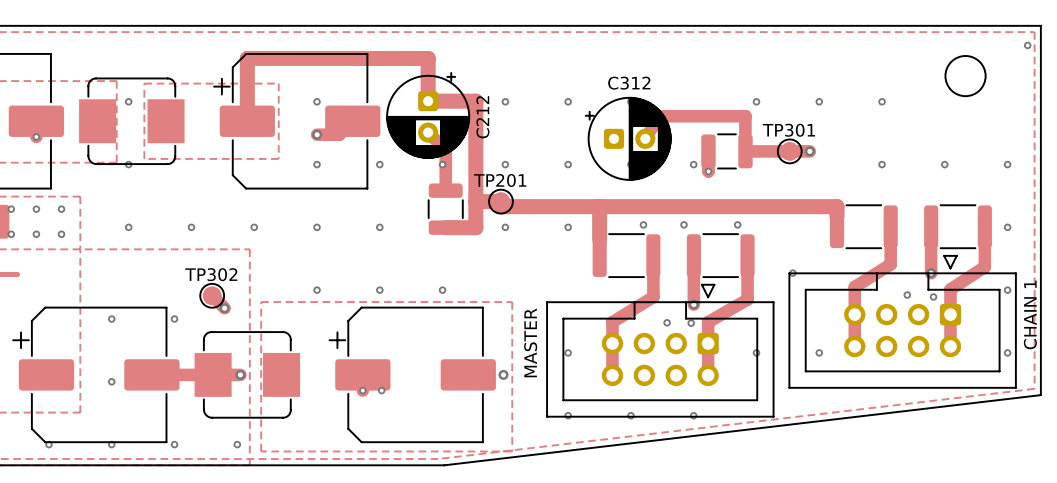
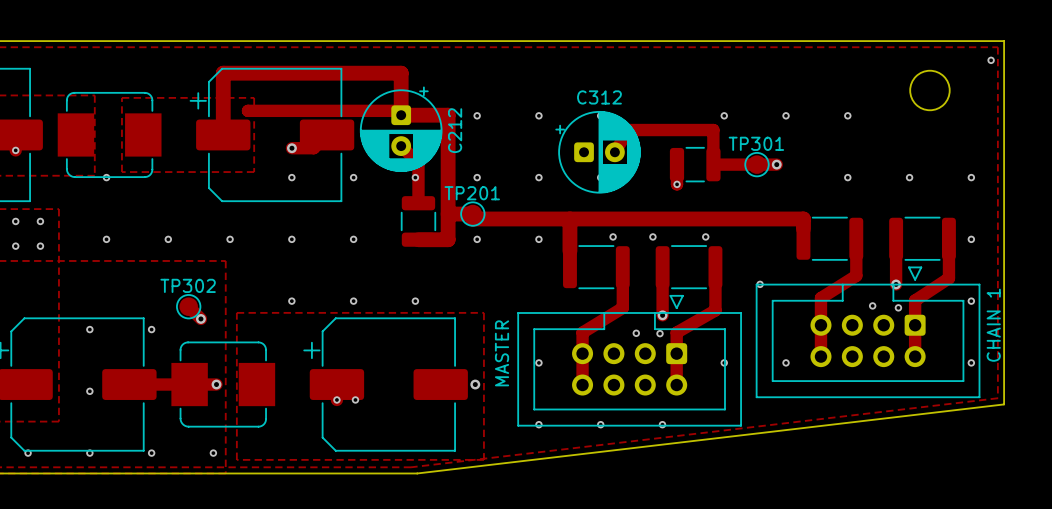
track: none -> (248, 110) (396, 110) (401, 115)
via: (128, 101) -> none
via: (317, 101) -> none
via: (693, 164) -> none

